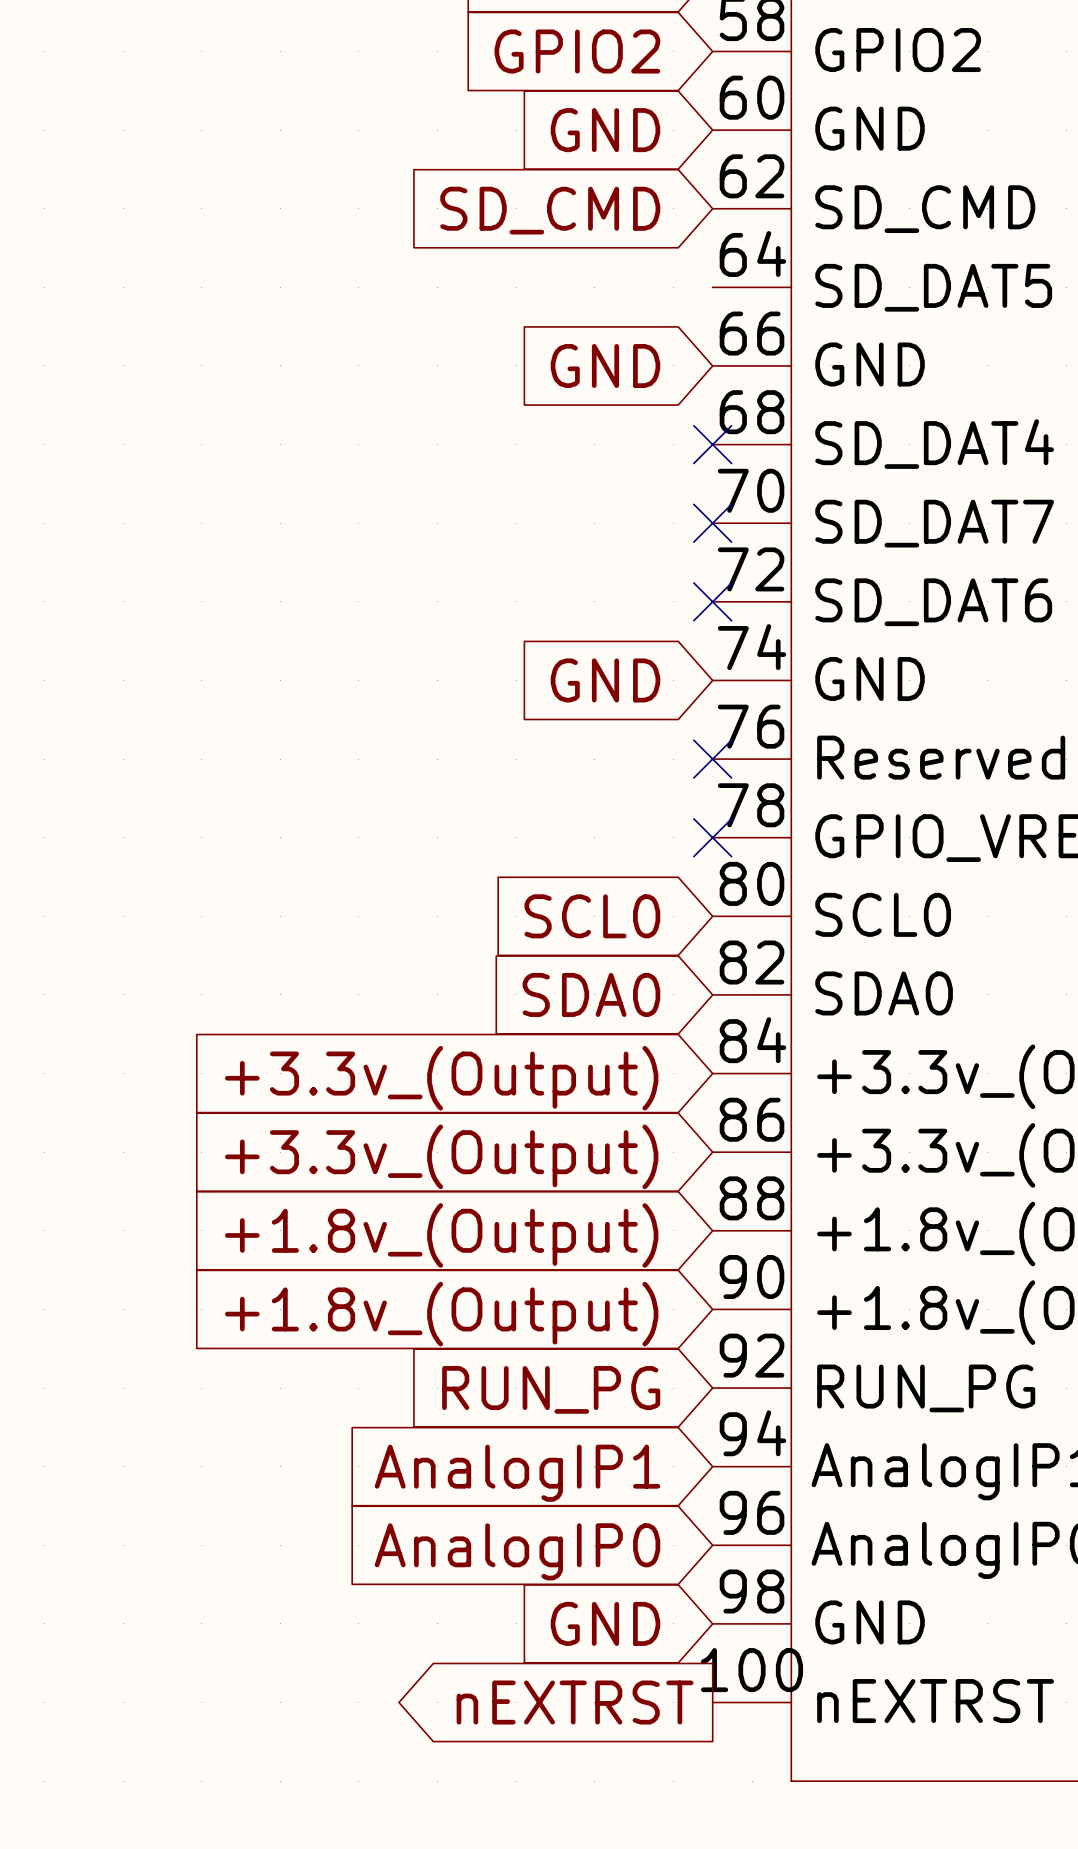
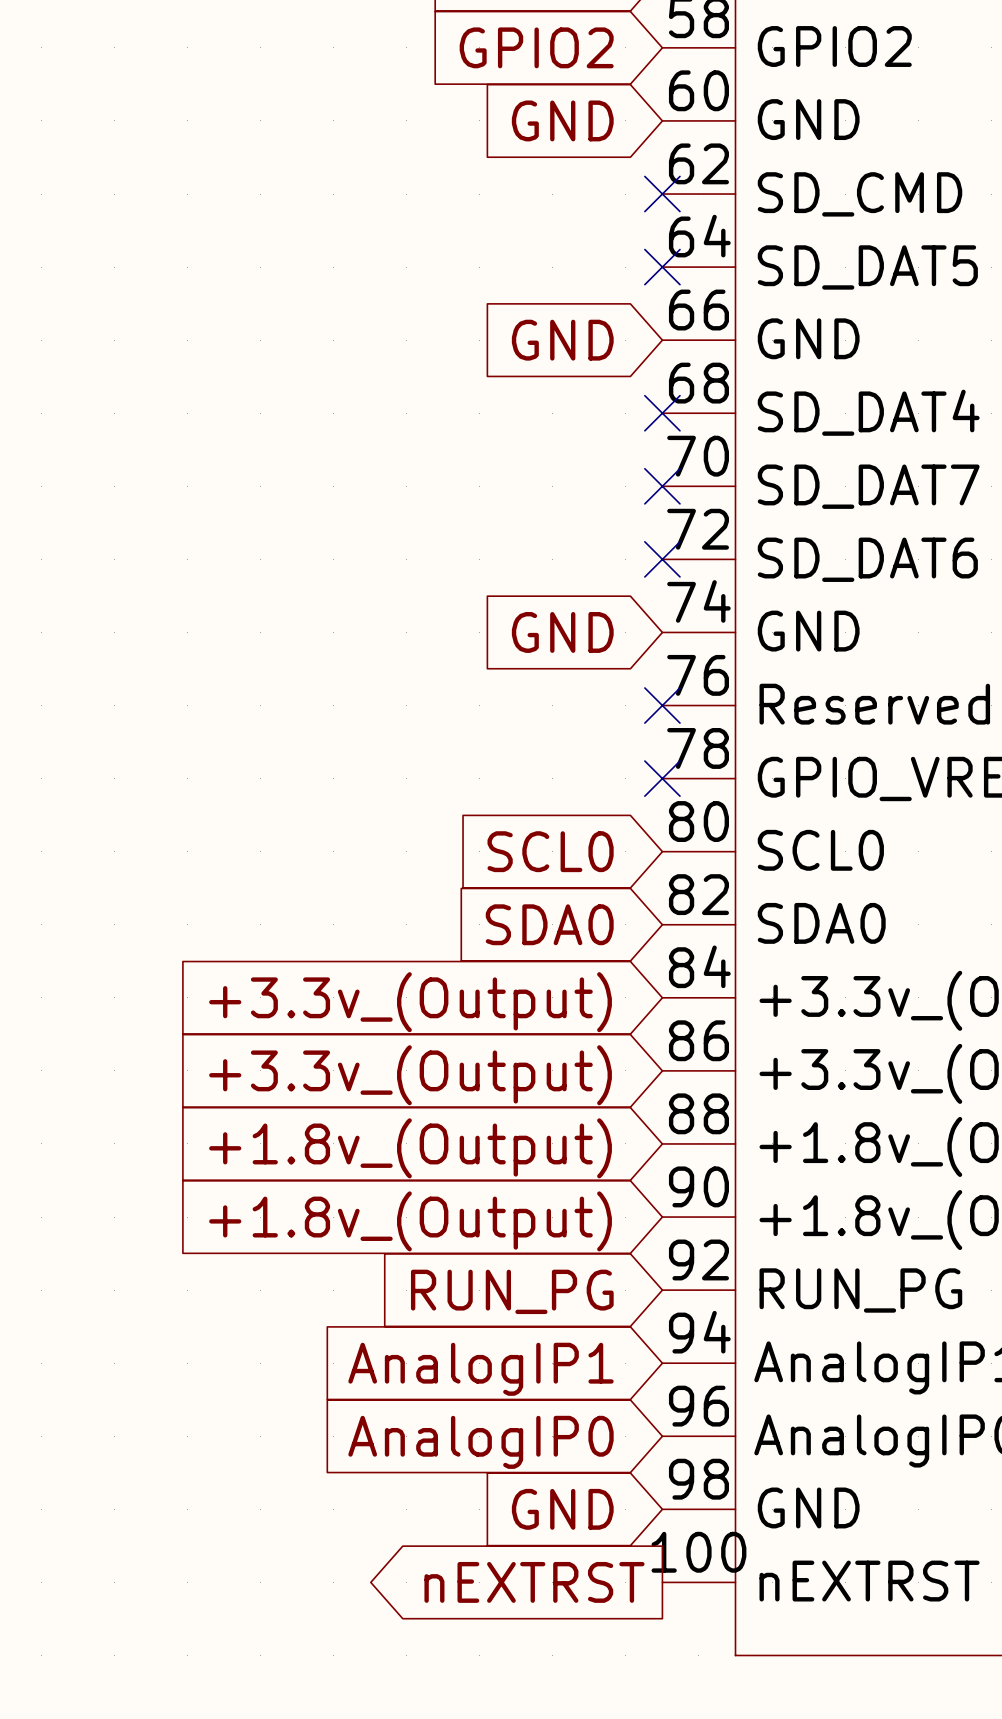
no-connect mark: none -> (662, 194)
global label: SD_CMD (550, 210) -> none
no-connect mark: none -> (662, 267)

